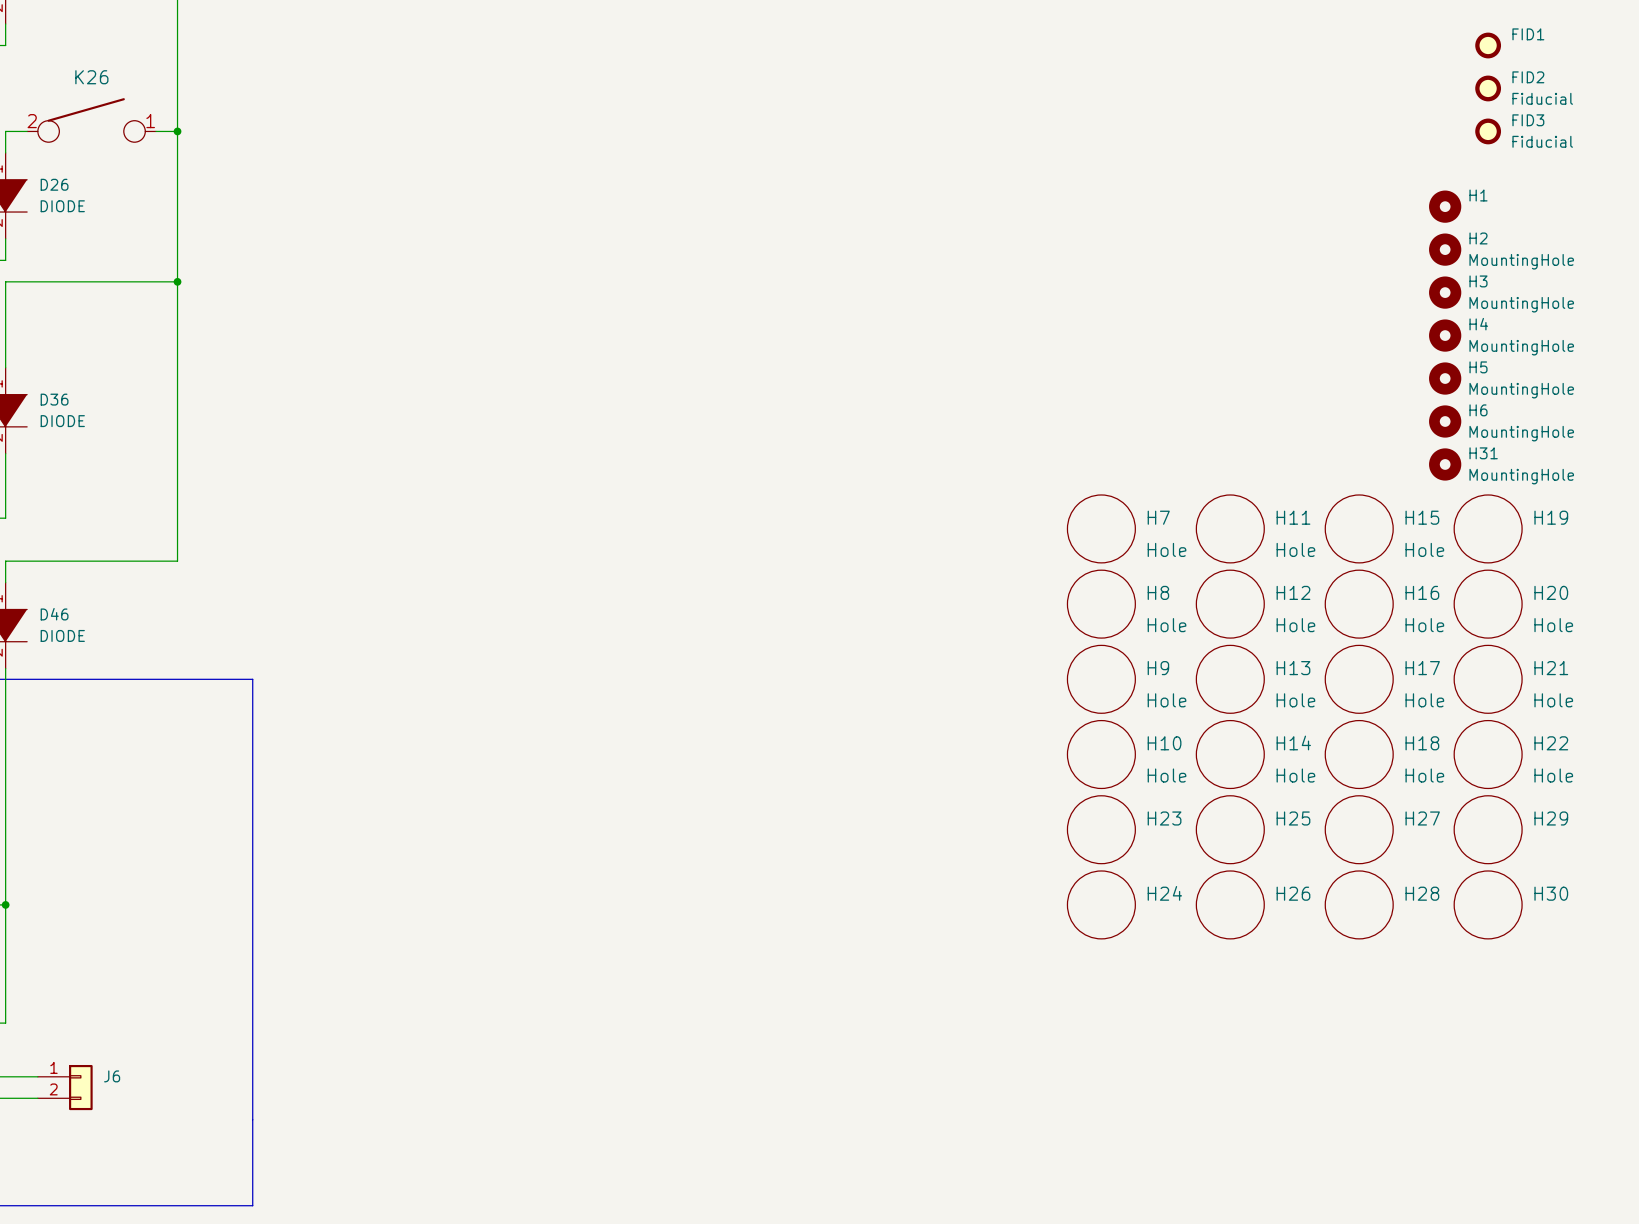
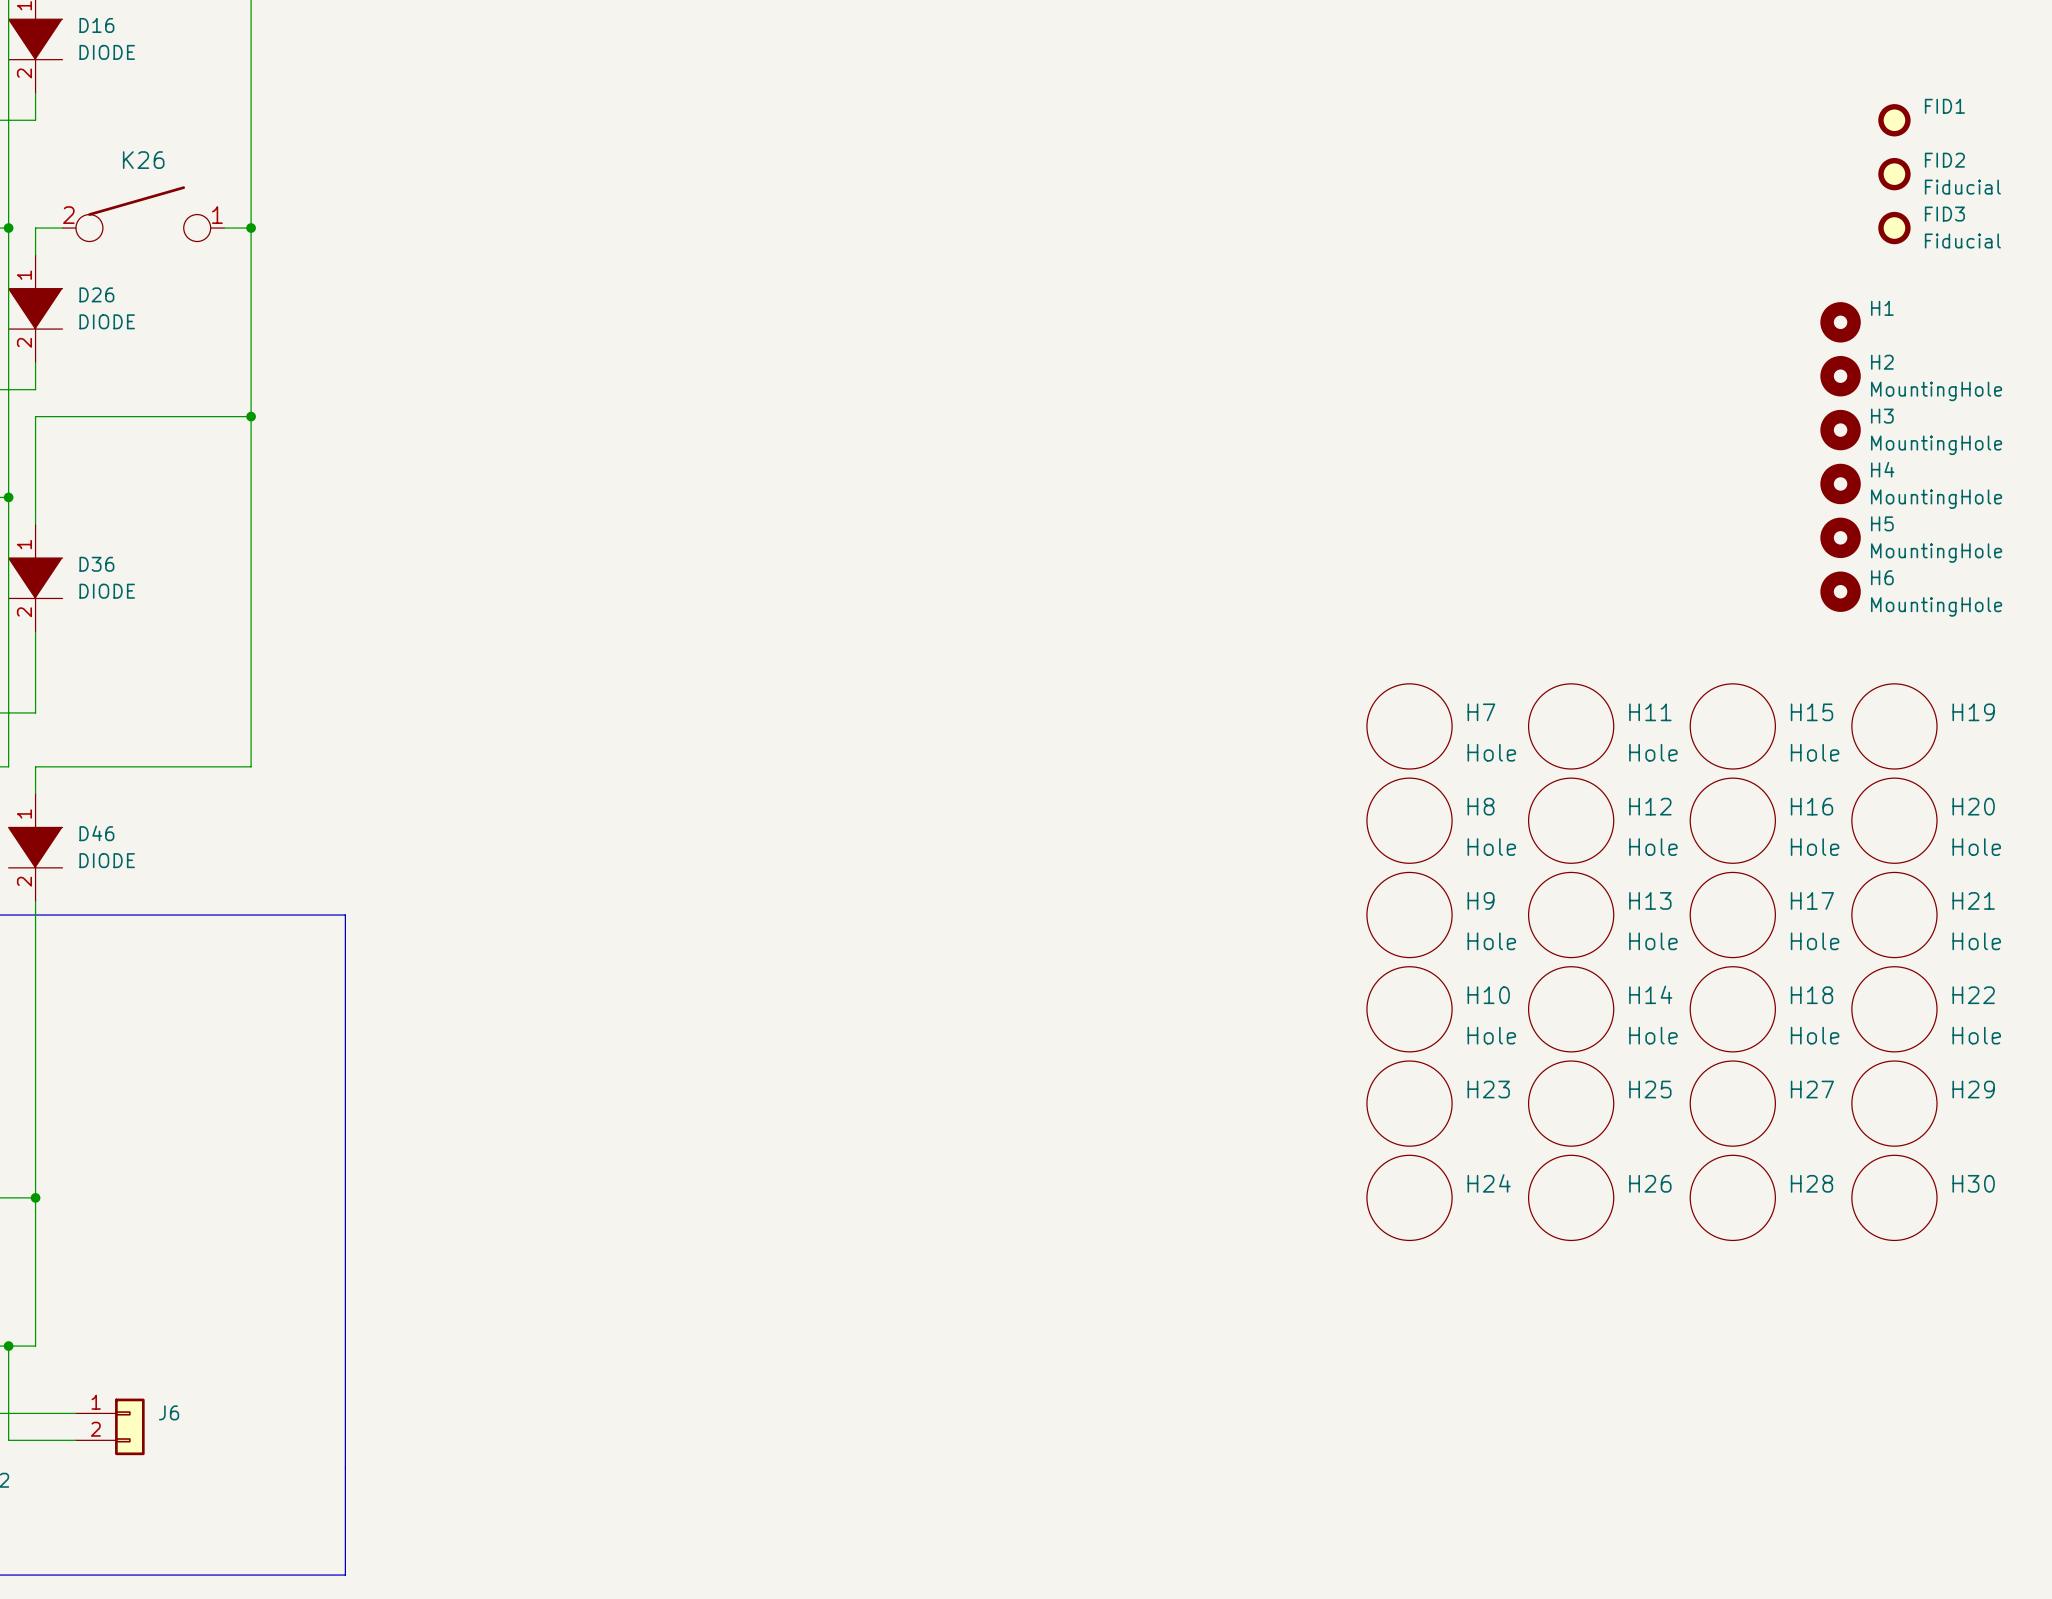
H31: MountingHole (1445, 464) -> none

